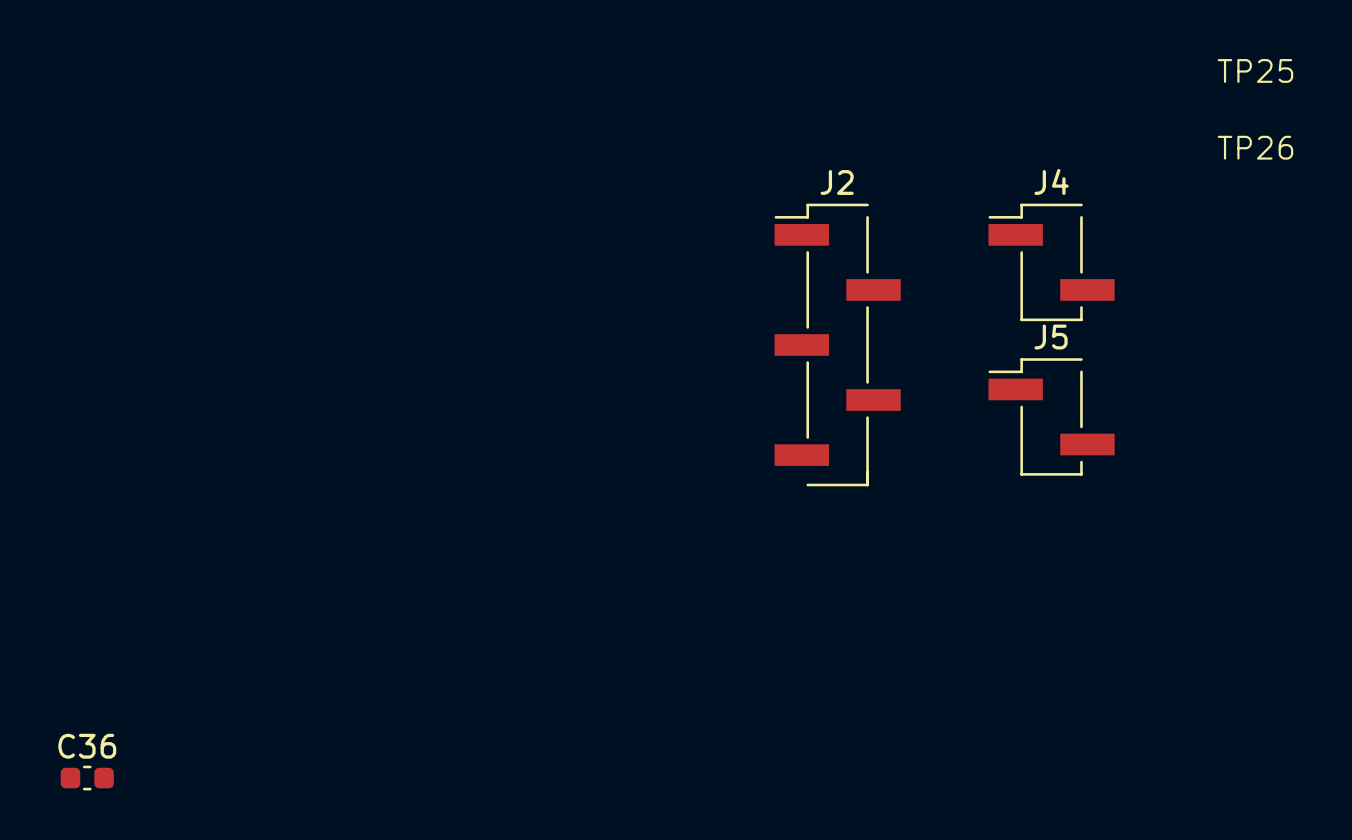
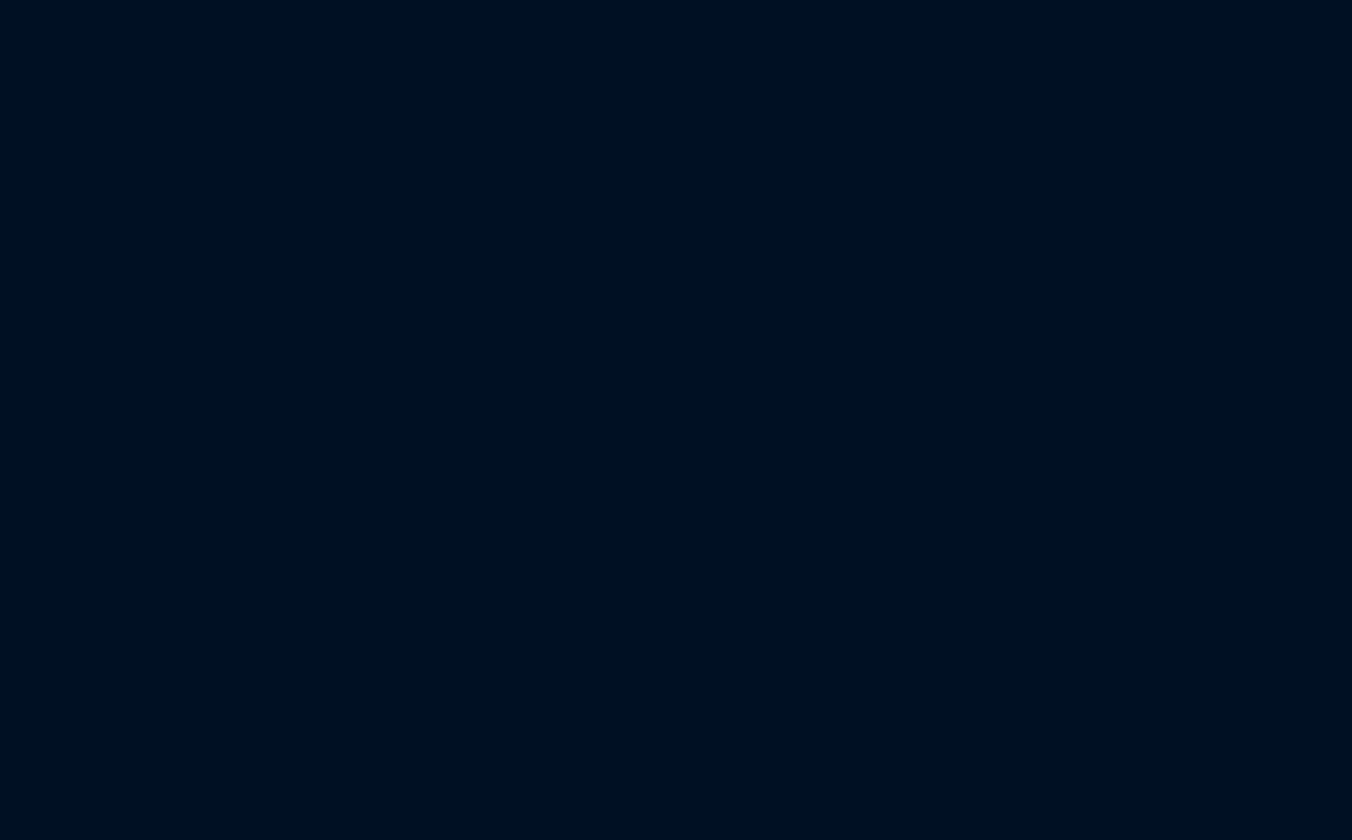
TP25: (1255, 70) -> none
TP26: (1255, 147) -> none
J4: (1051, 262) -> none
J2: (837, 344) -> none
J5: (1051, 416) -> none
C36: (87, 778) -> none

